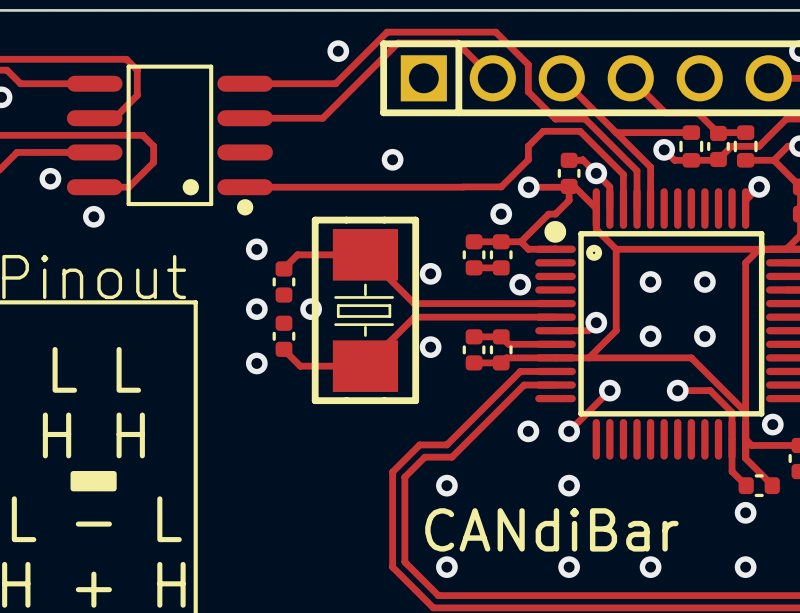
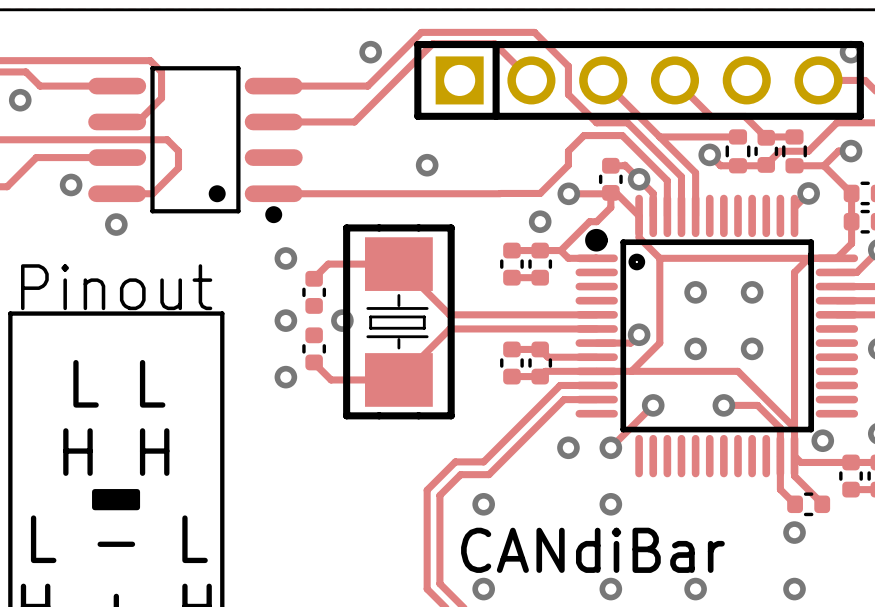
via: (430, 273) -> none
via: (520, 284) -> none
via: (430, 347) -> none

